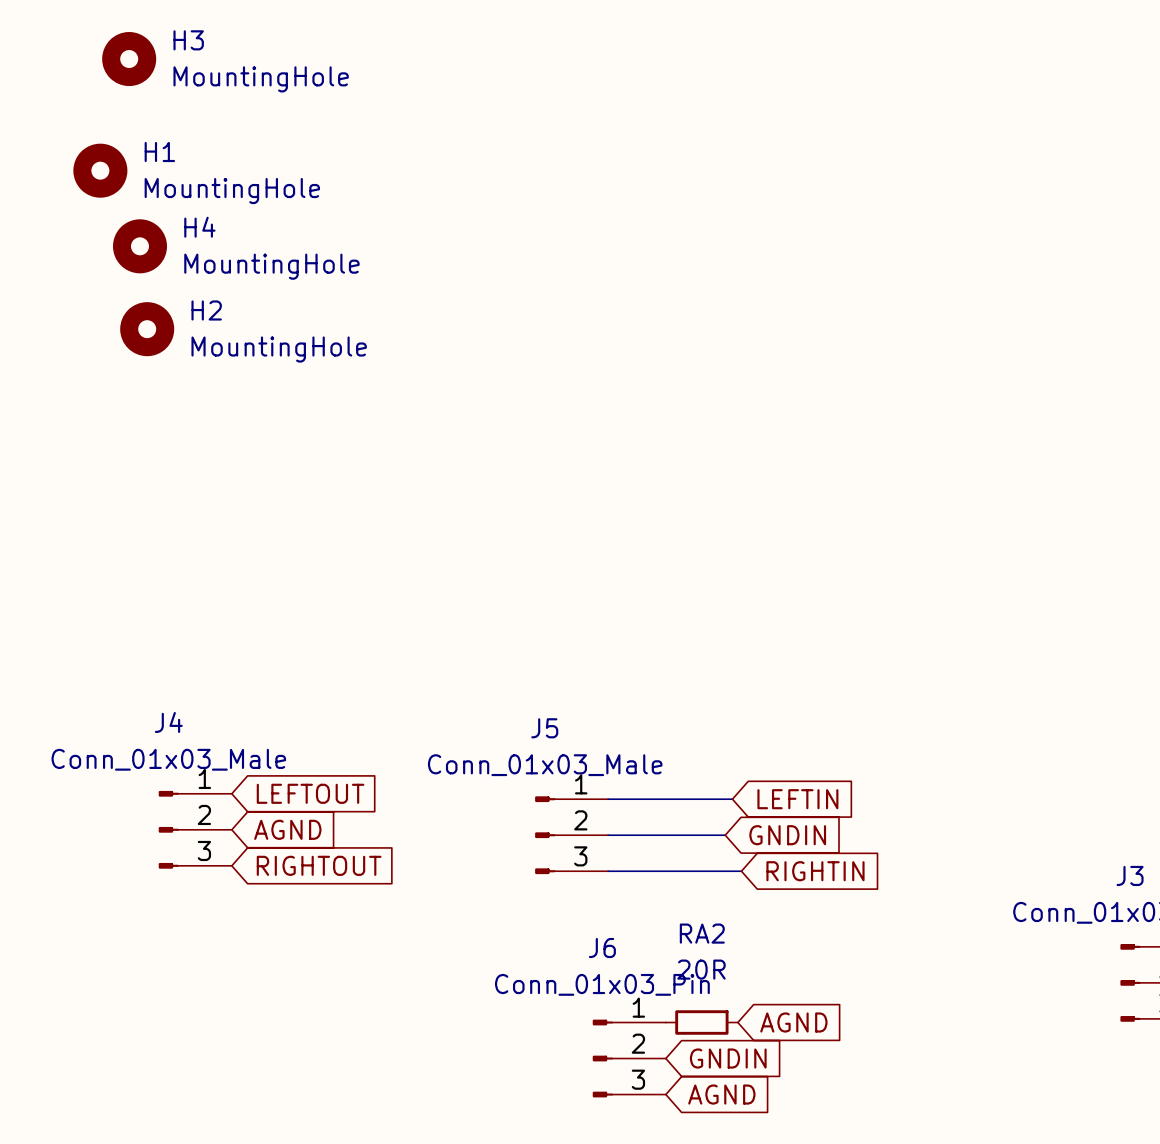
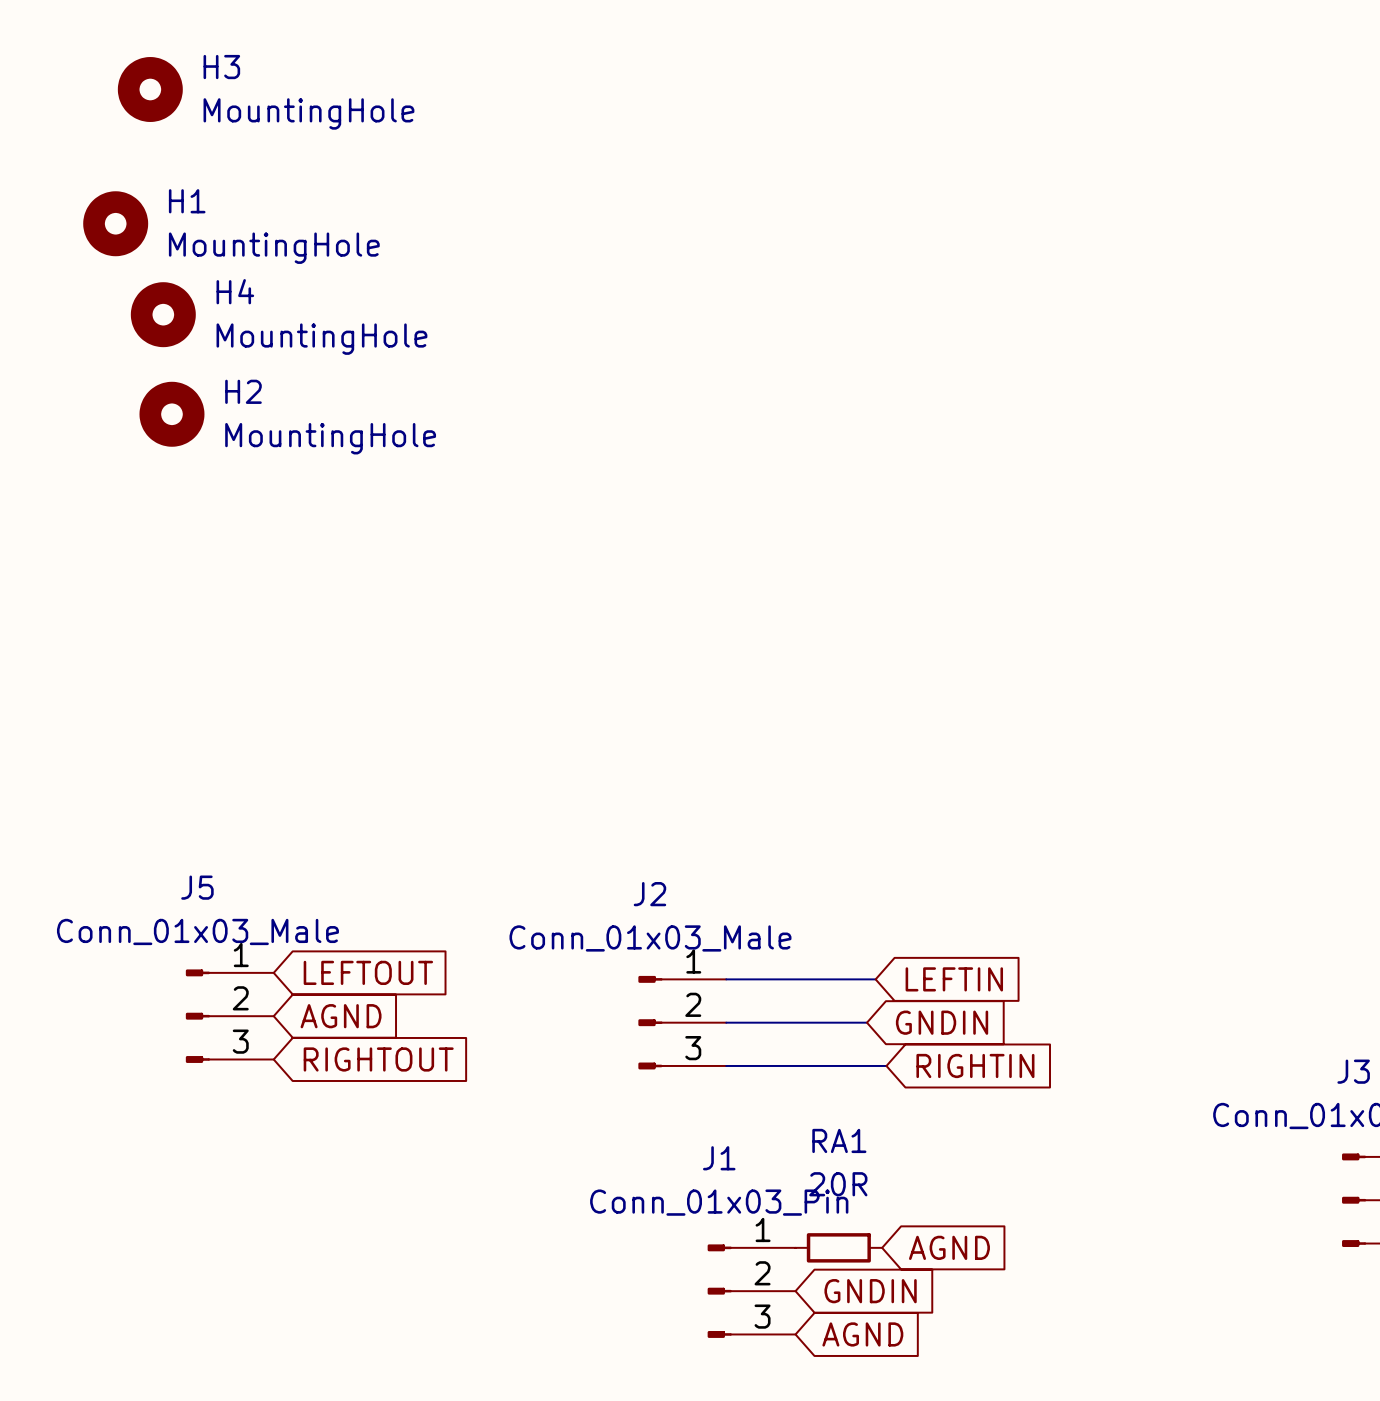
J4 name: J4 (168, 722) -> J5 (197, 887)
J5 name: J5 (544, 728) -> J2 (649, 894)
RA2 name: RA2 (702, 933) -> RA1 (839, 1140)
J6 name: J6 (602, 948) -> J1 (719, 1158)

